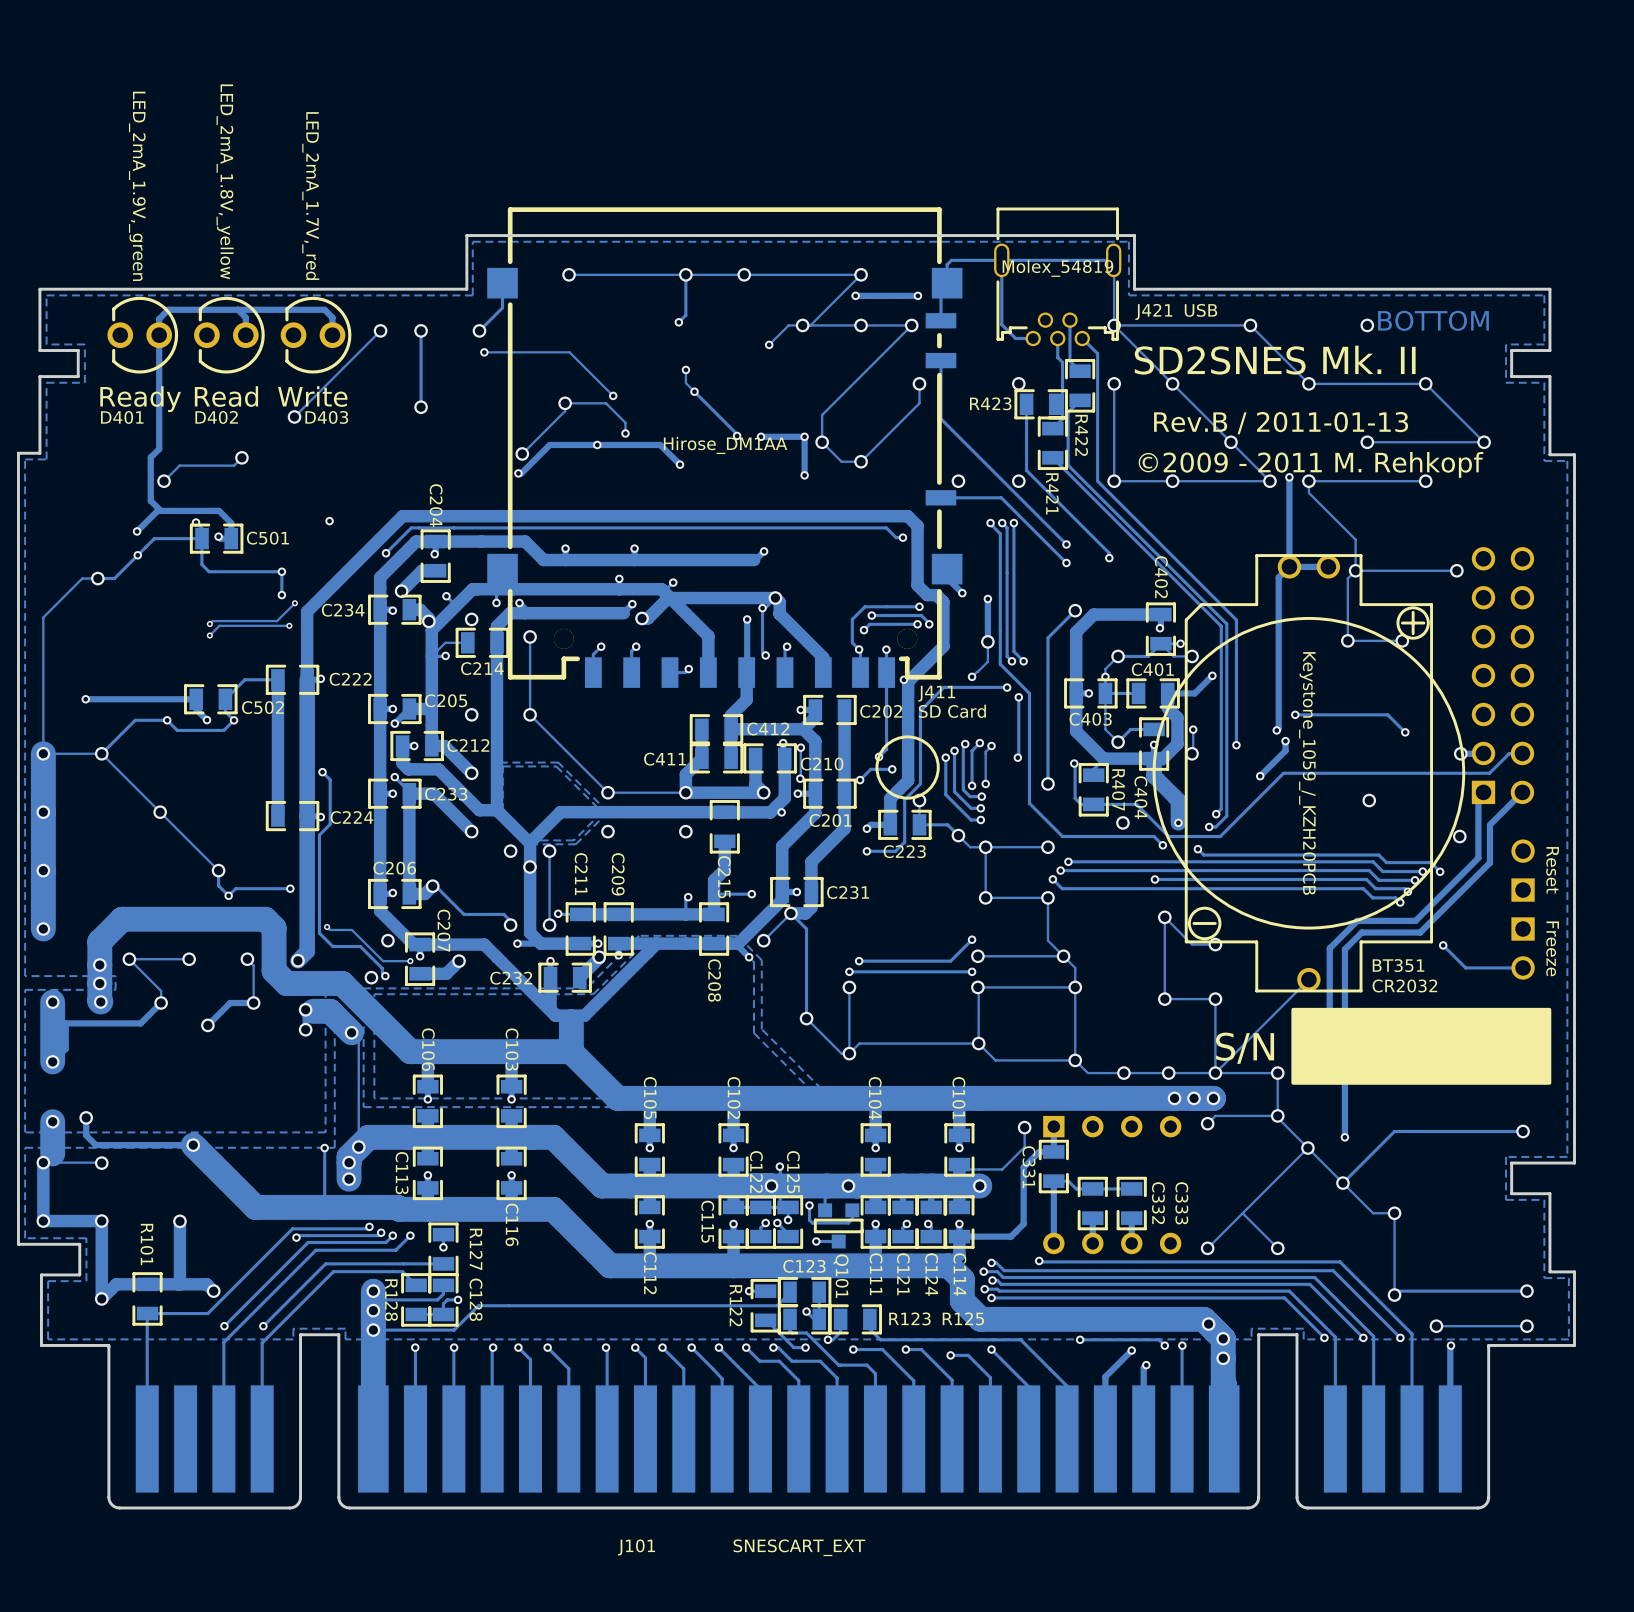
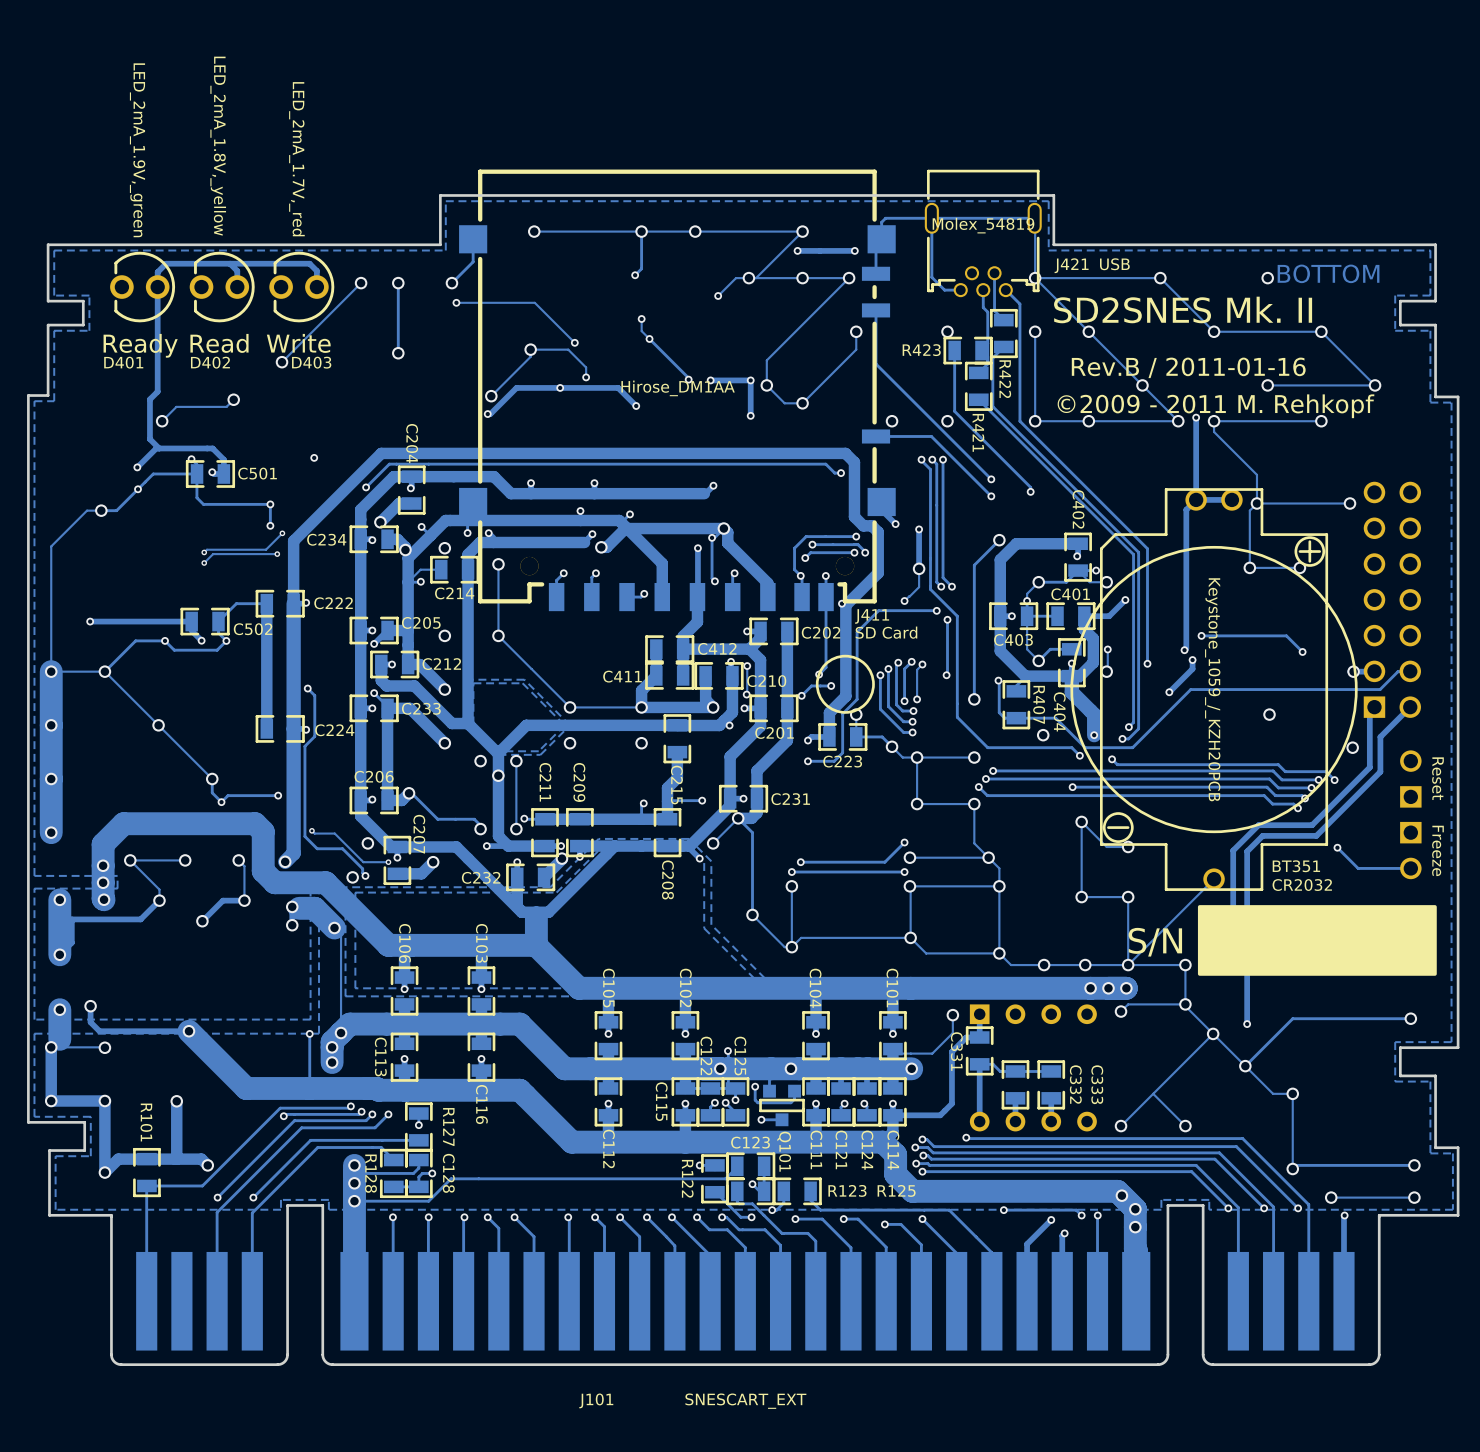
text: Rev.B / 2011-01-13 (1281, 423) -> Rev.B / 2011-01-16 (1188, 367)

